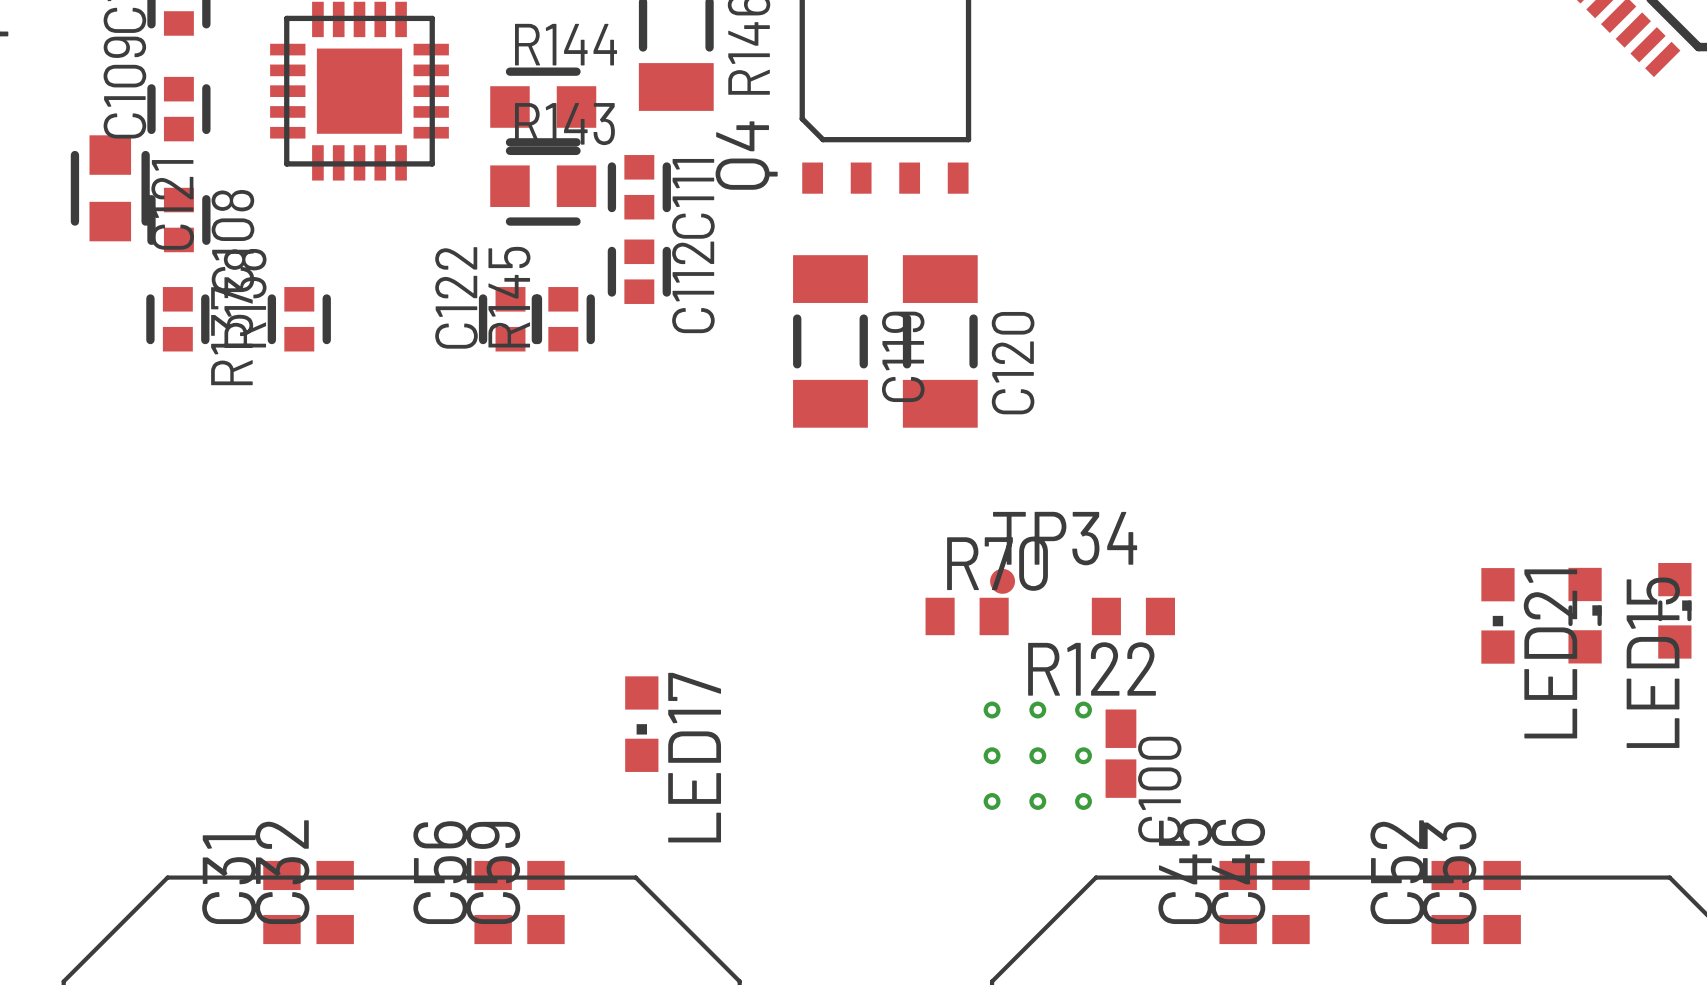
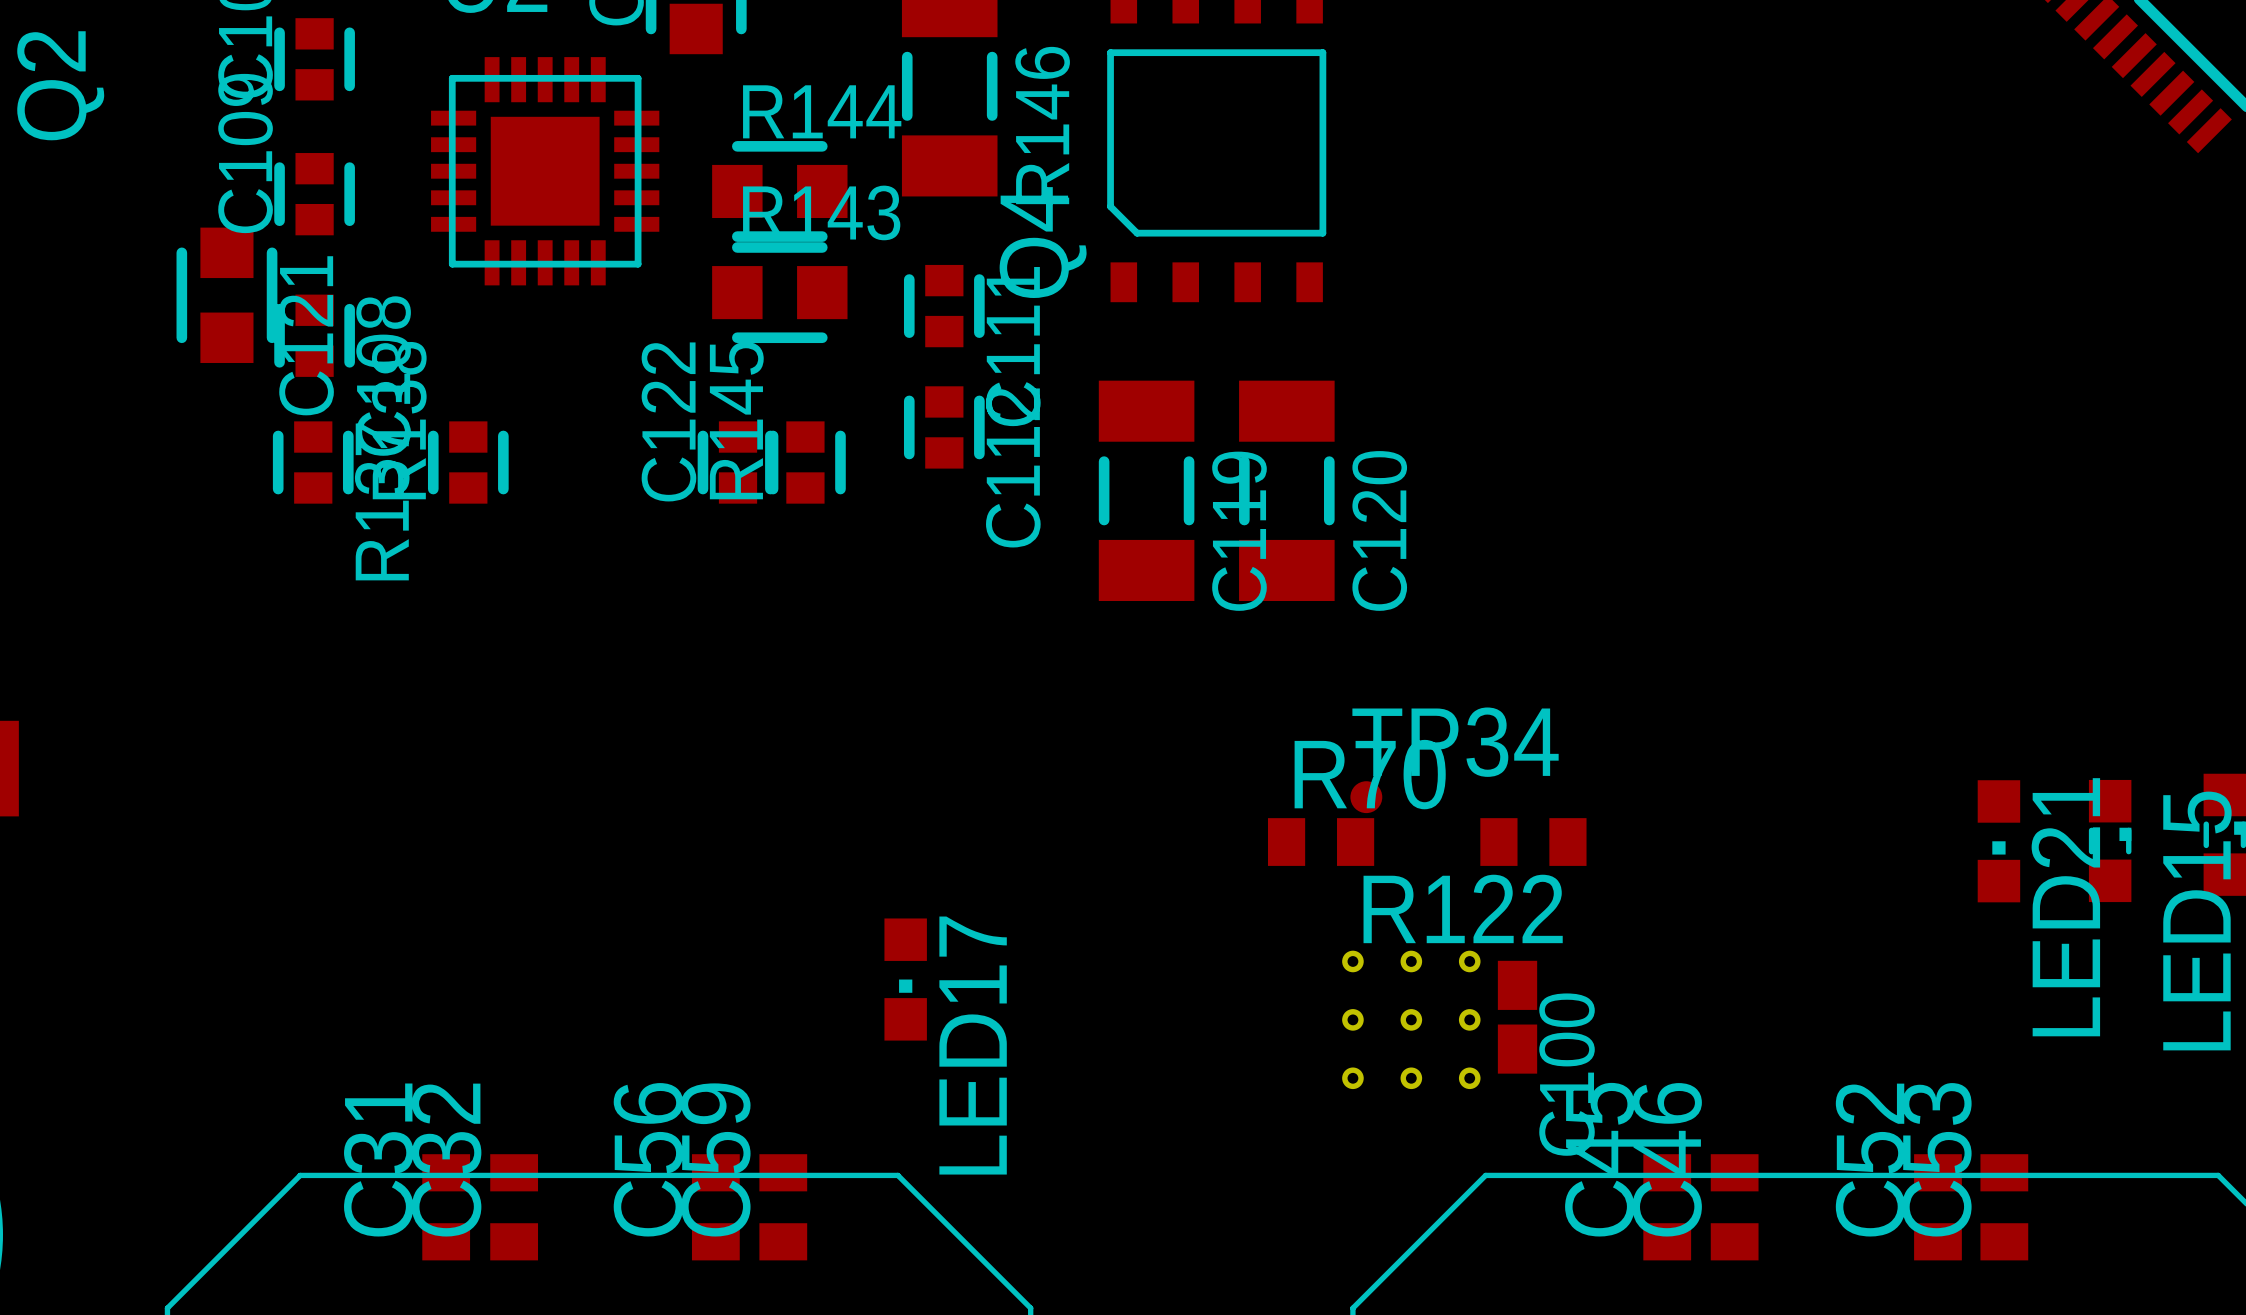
C111 position: (639, 187) -> (944, 306)
C112 position: (639, 271) -> (944, 427)

